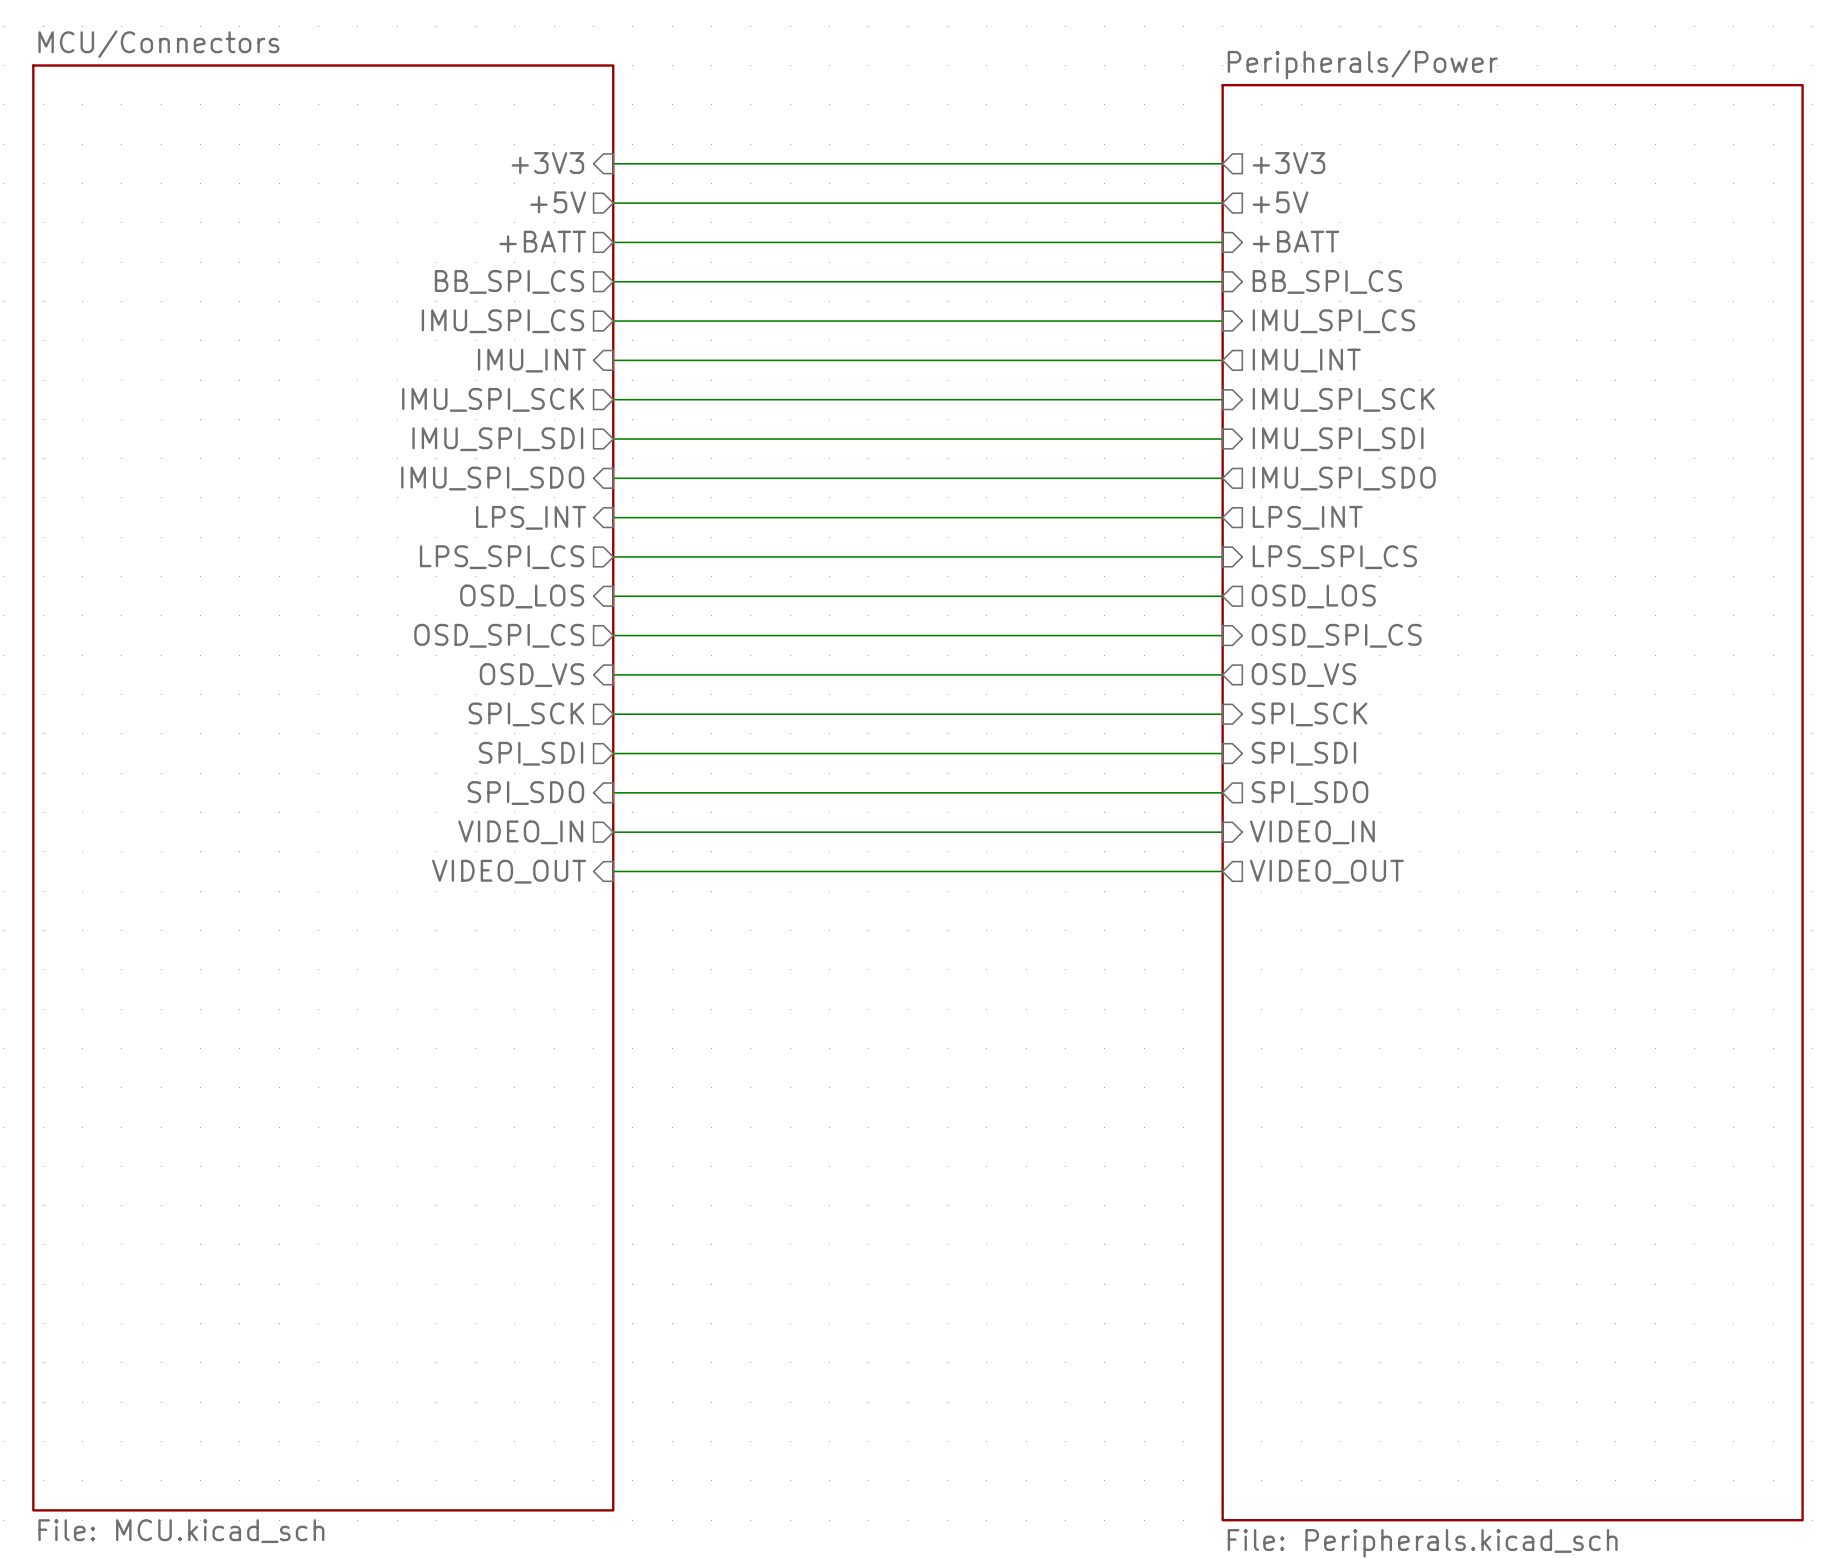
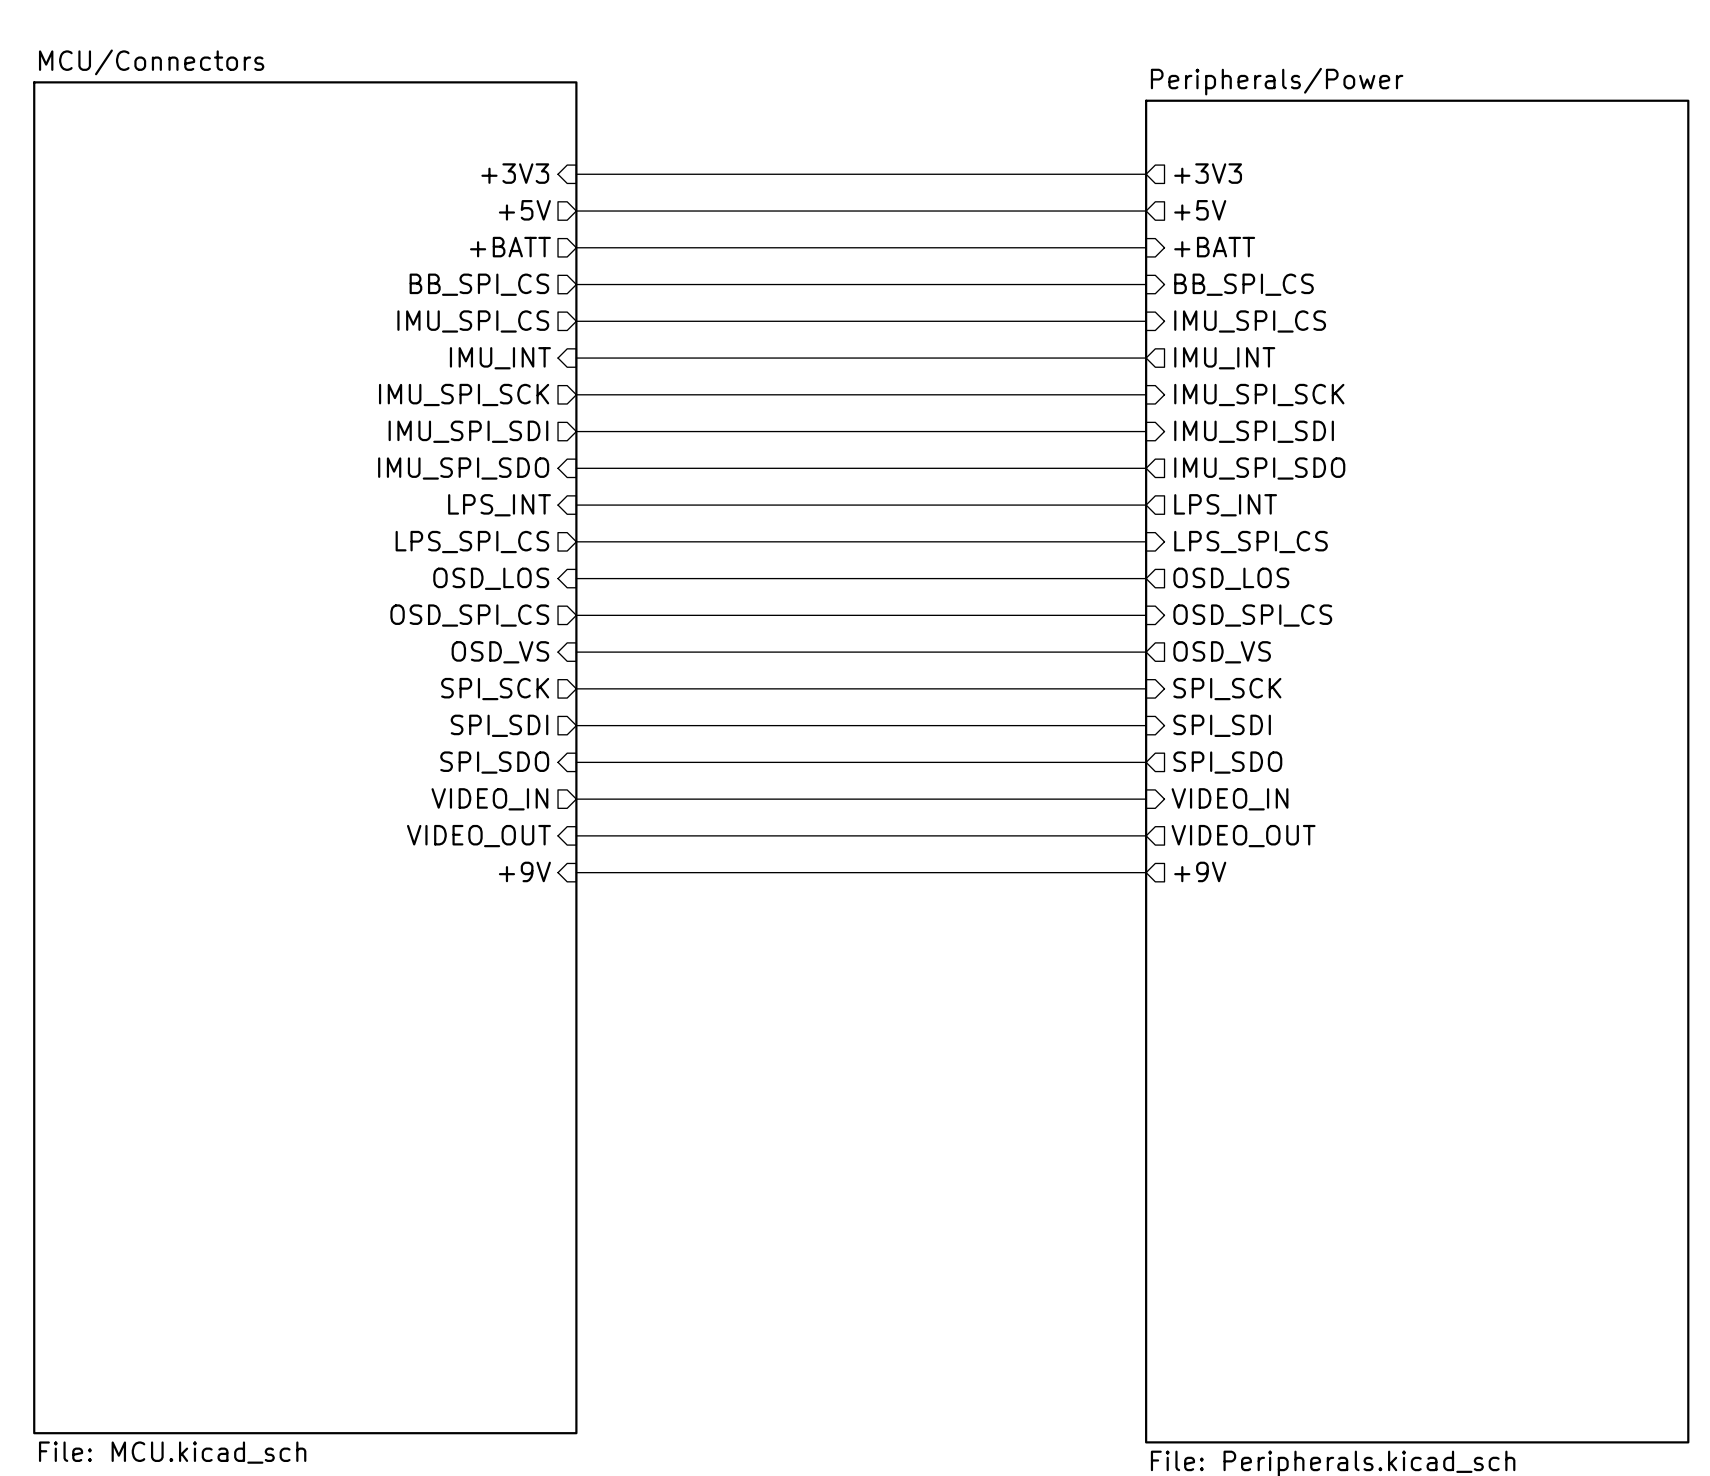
sheet pin: none -> +9V (524, 871)
wire: none -> (576, 872) (1146, 872)
sheet pin: none -> +9V (1200, 871)

